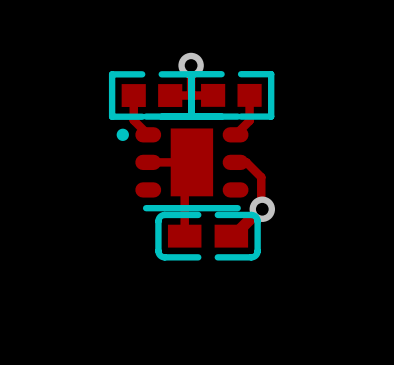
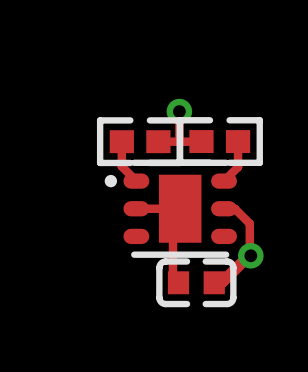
part footprint: [155, 211, 261, 261] -> [156, 258, 237, 308]

